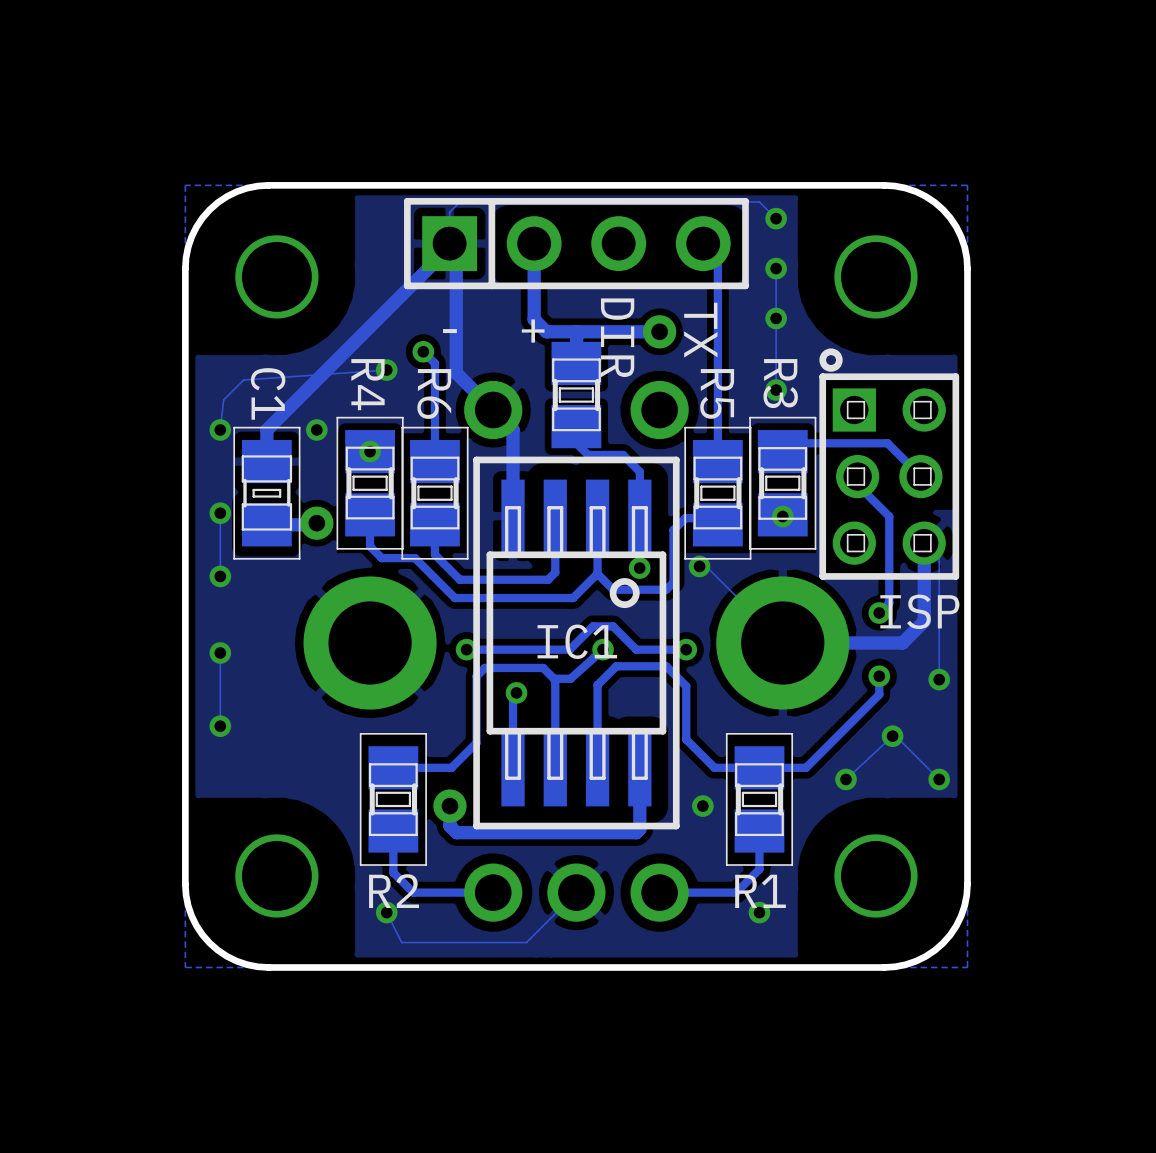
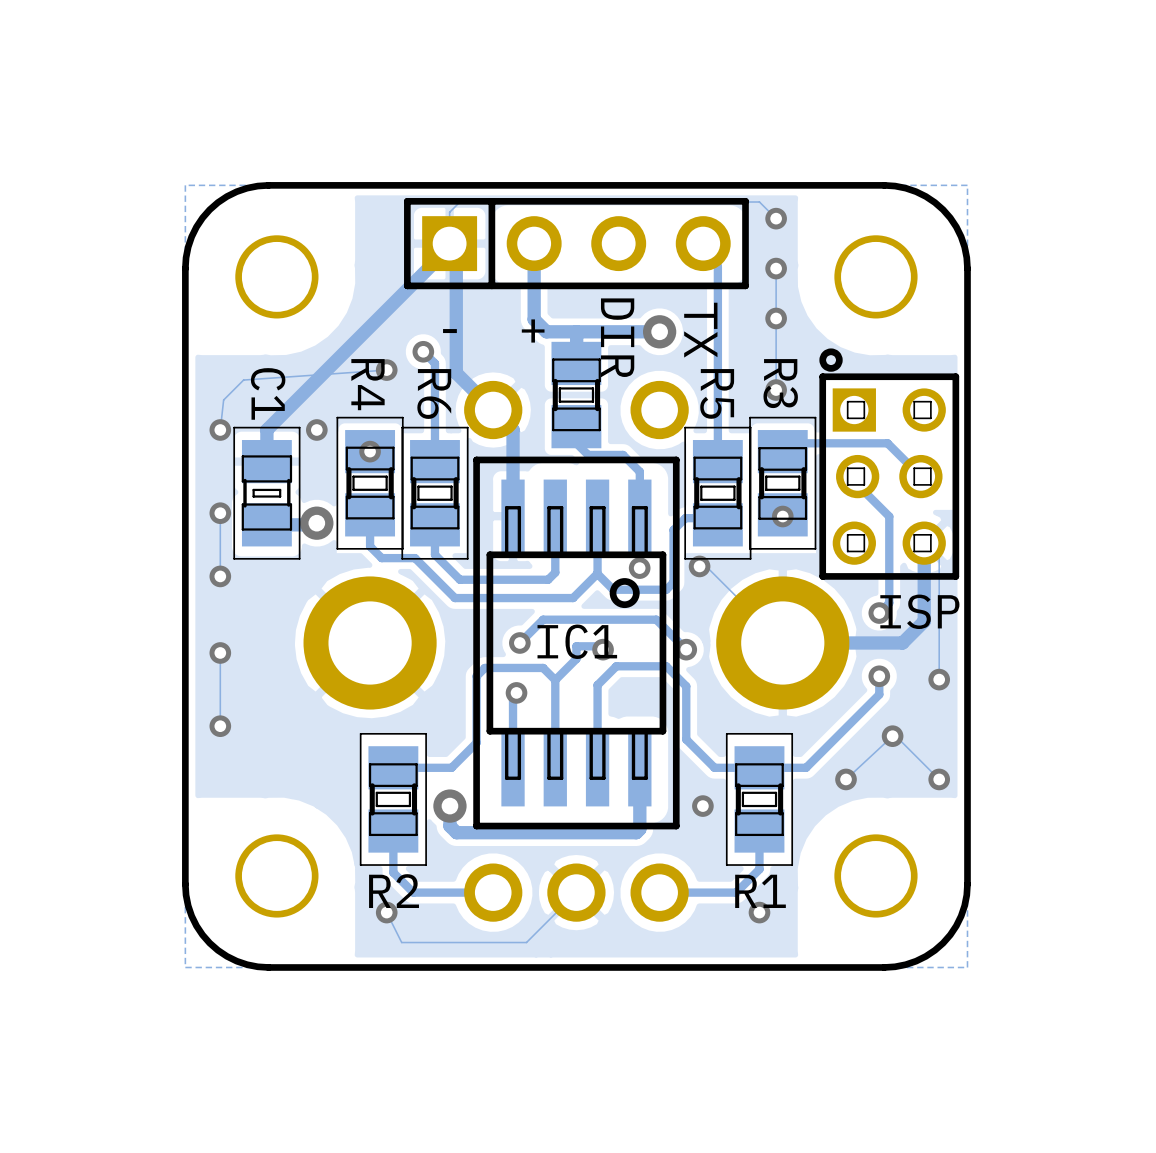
track: none -> (603, 646) (576, 646) (576, 658) (555, 680)
via position: (466, 649) -> (519, 642)
track: (603, 649) (570, 678) (553, 678) -> none
track: (686, 649) (636, 649) (613, 626) (593, 626) (569, 649) (466, 649) -> (686, 649) (656, 619) (543, 619) (519, 642)

